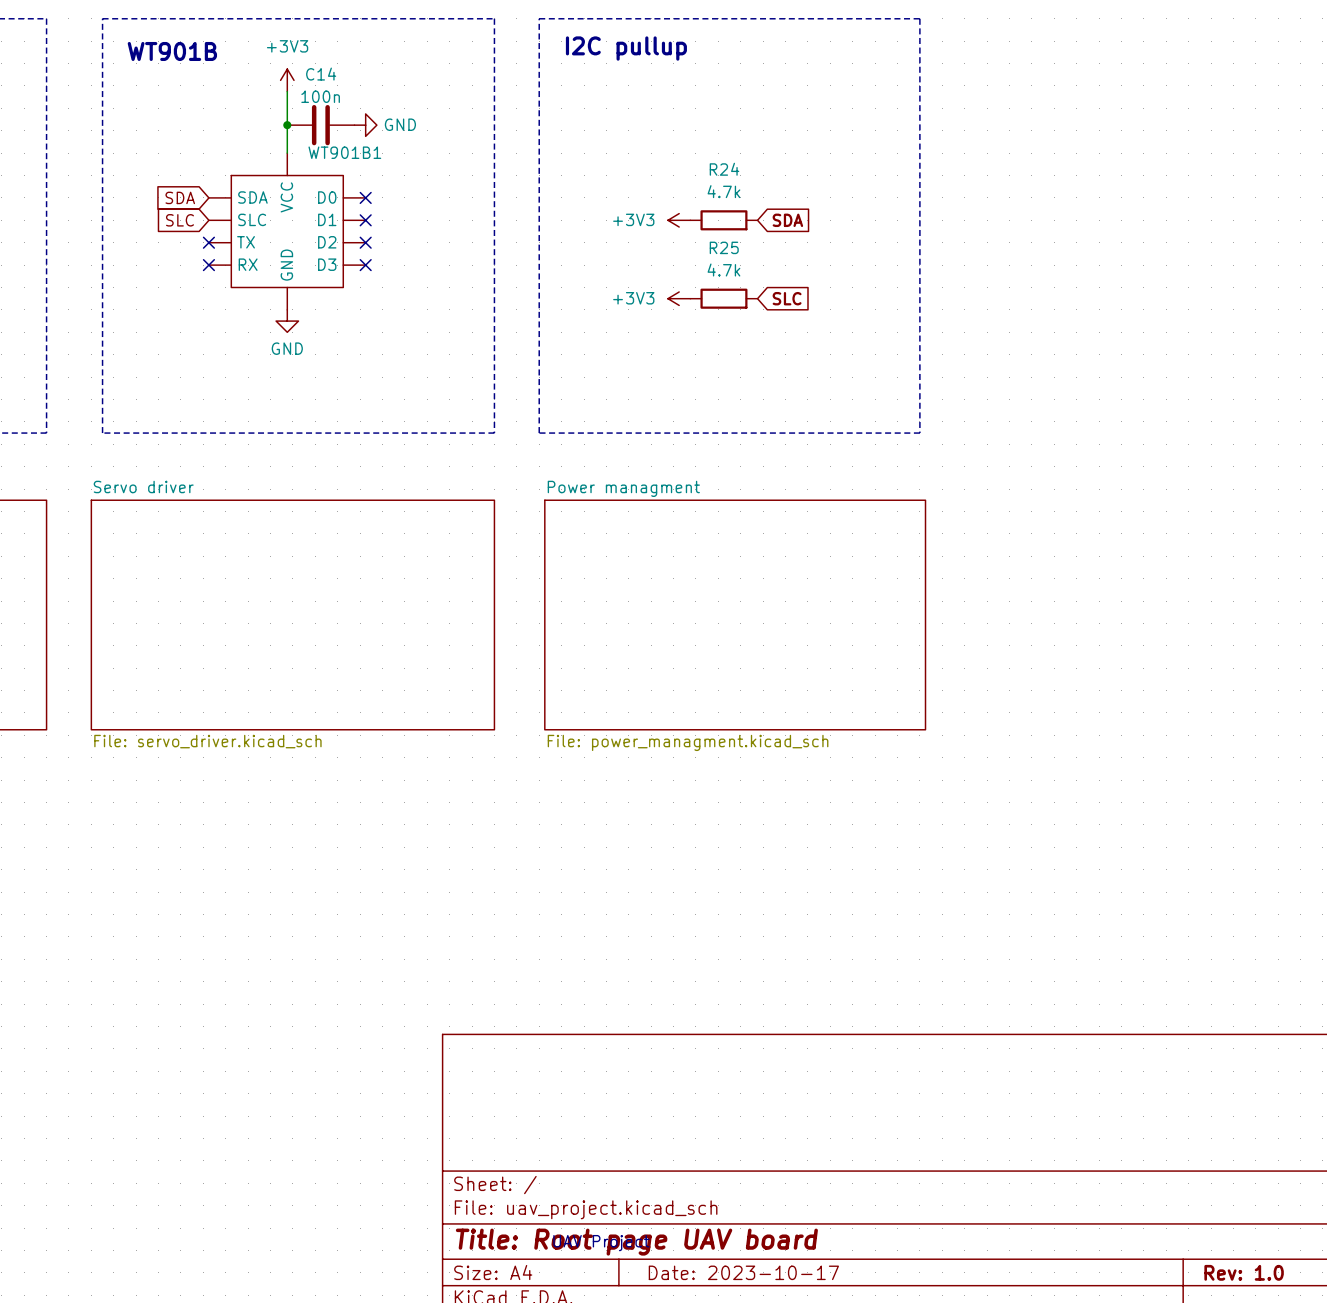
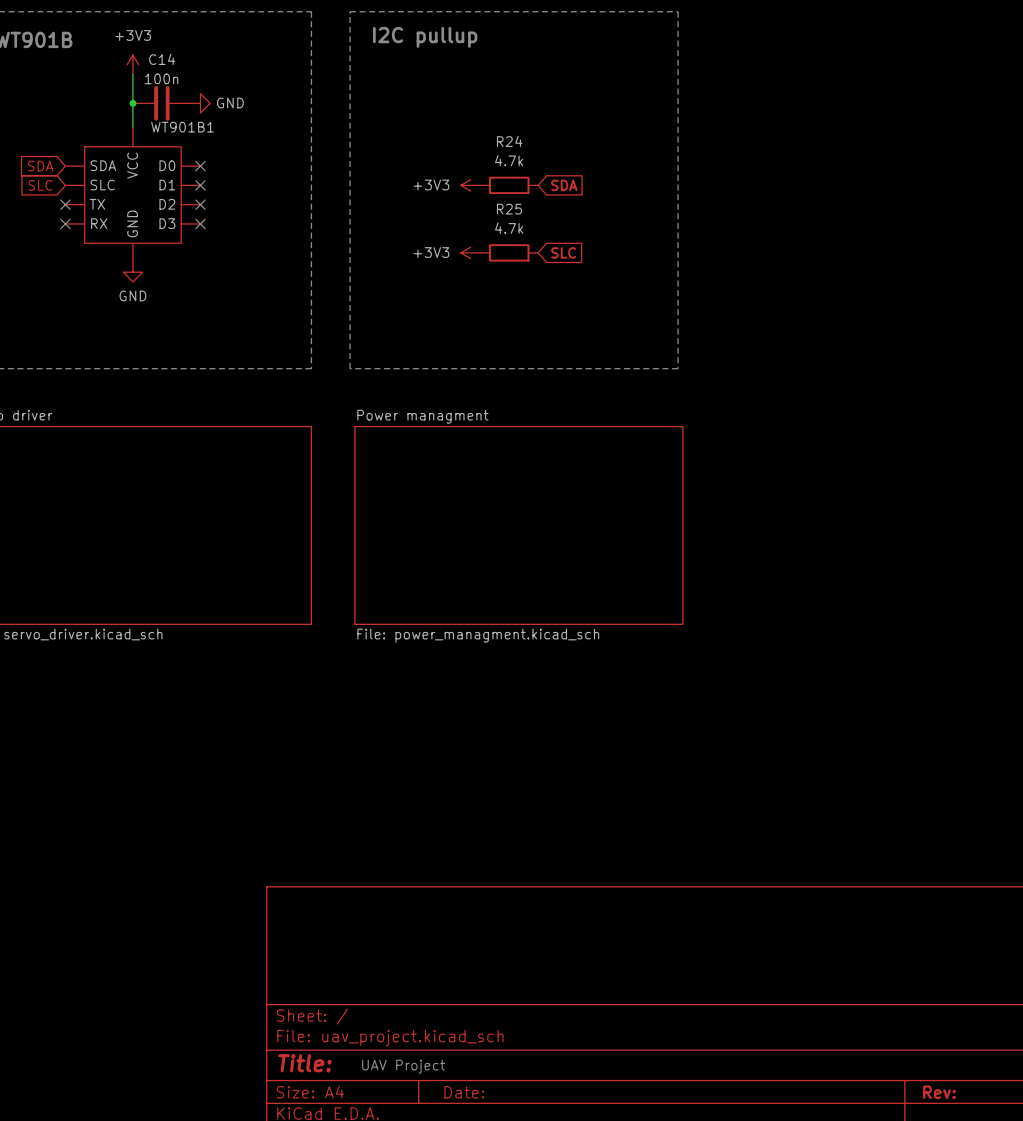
title block: Title: Root page UAV board (636, 1242) -> Title: (304, 1063)
title block: Date: 2023-10-17 (743, 1272) -> Date: (464, 1092)
title block: Rev: 1.0 (1244, 1272) -> Rev: (939, 1092)

